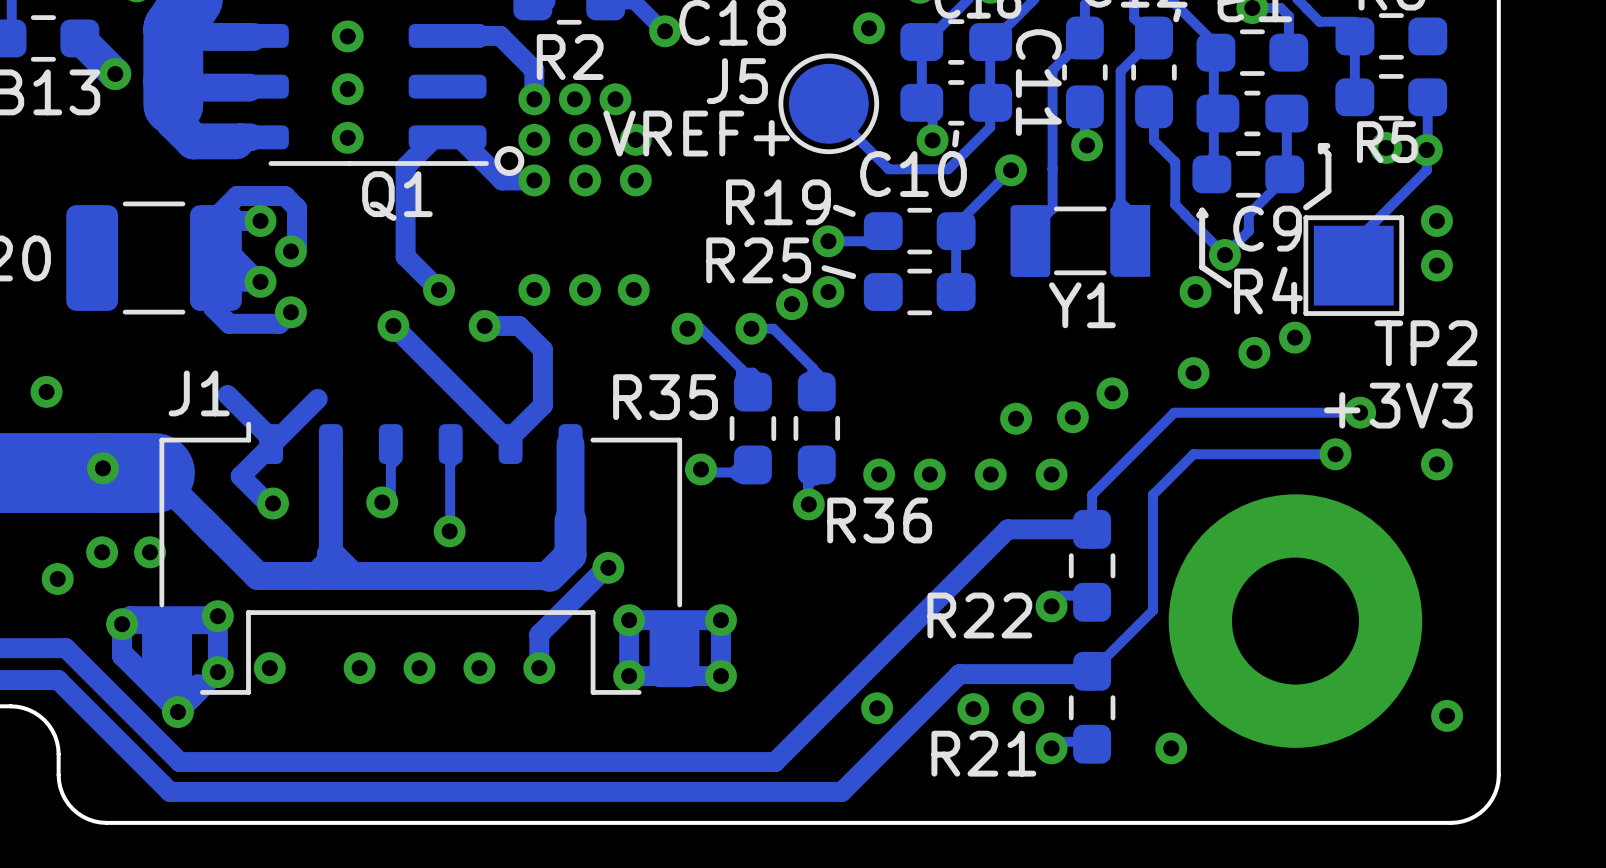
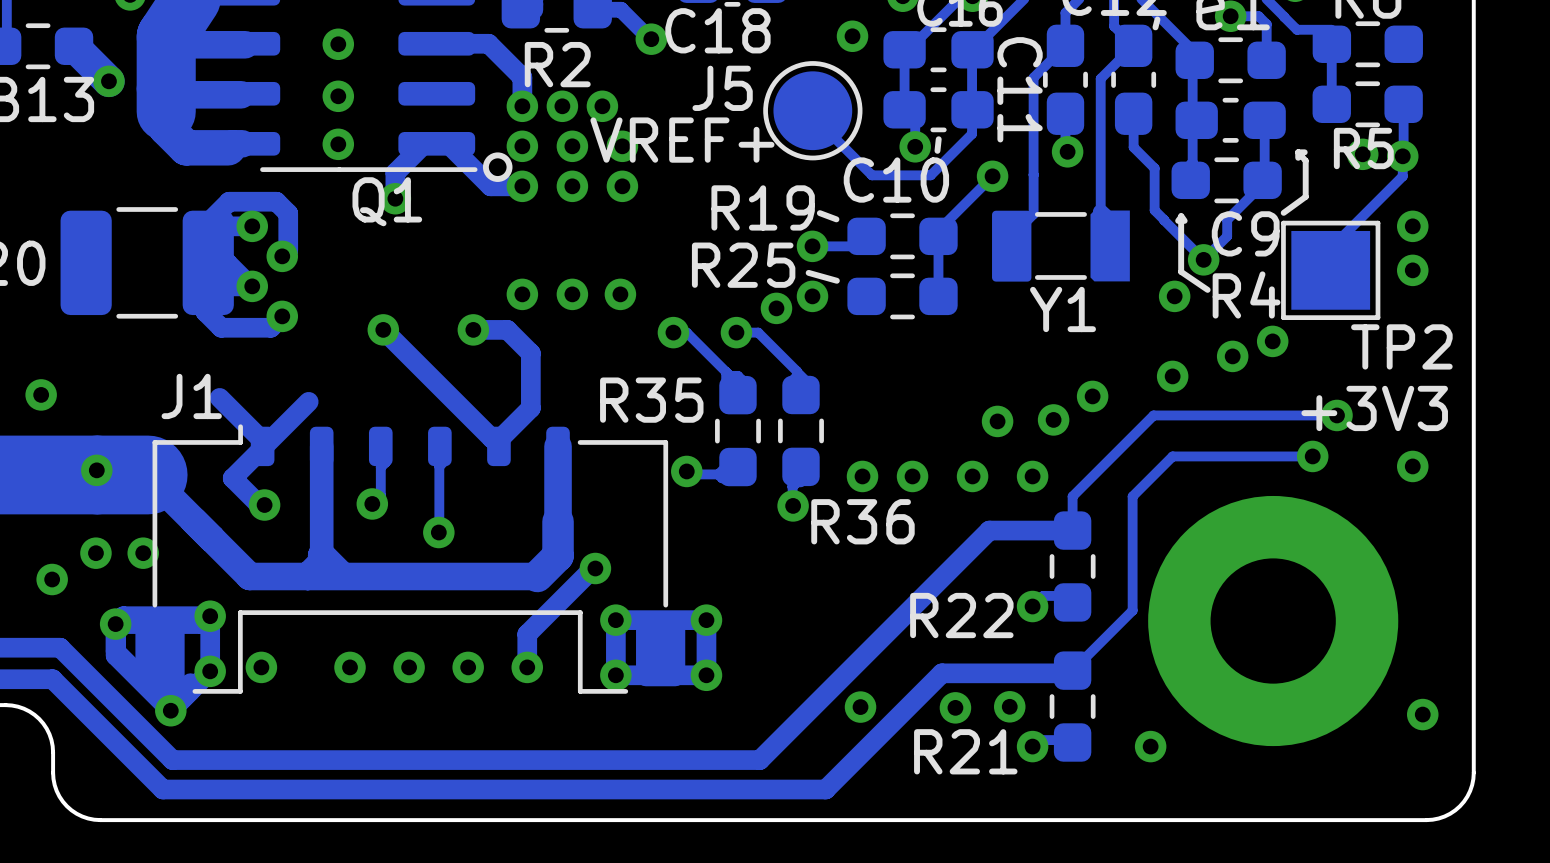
track: (405, 193) (405, 256) (439, 289) -> none
via position: (439, 289) -> (395, 198)

